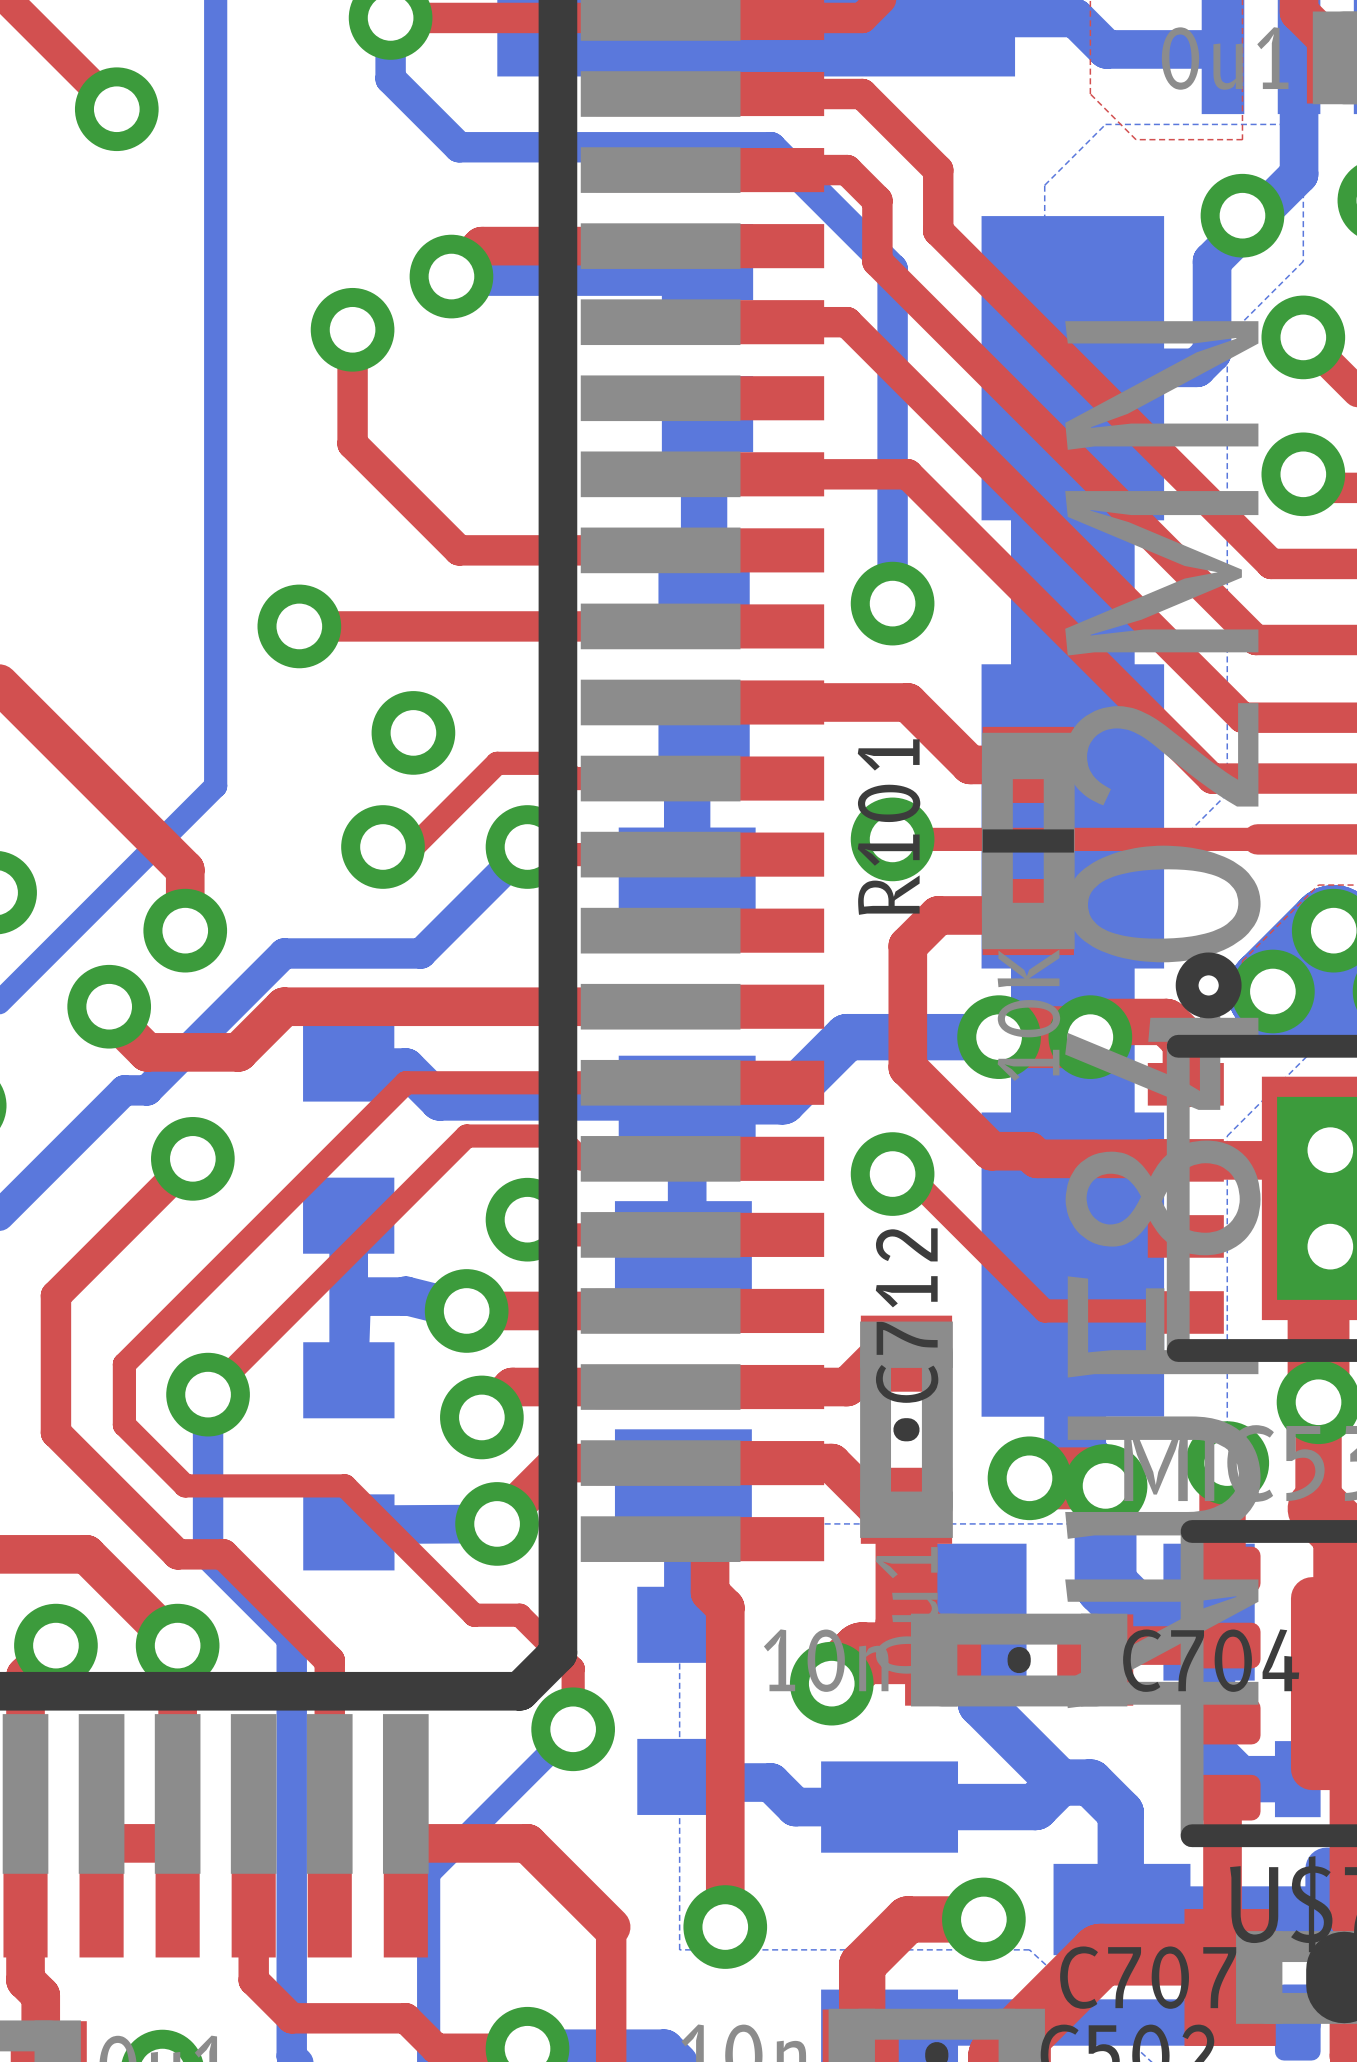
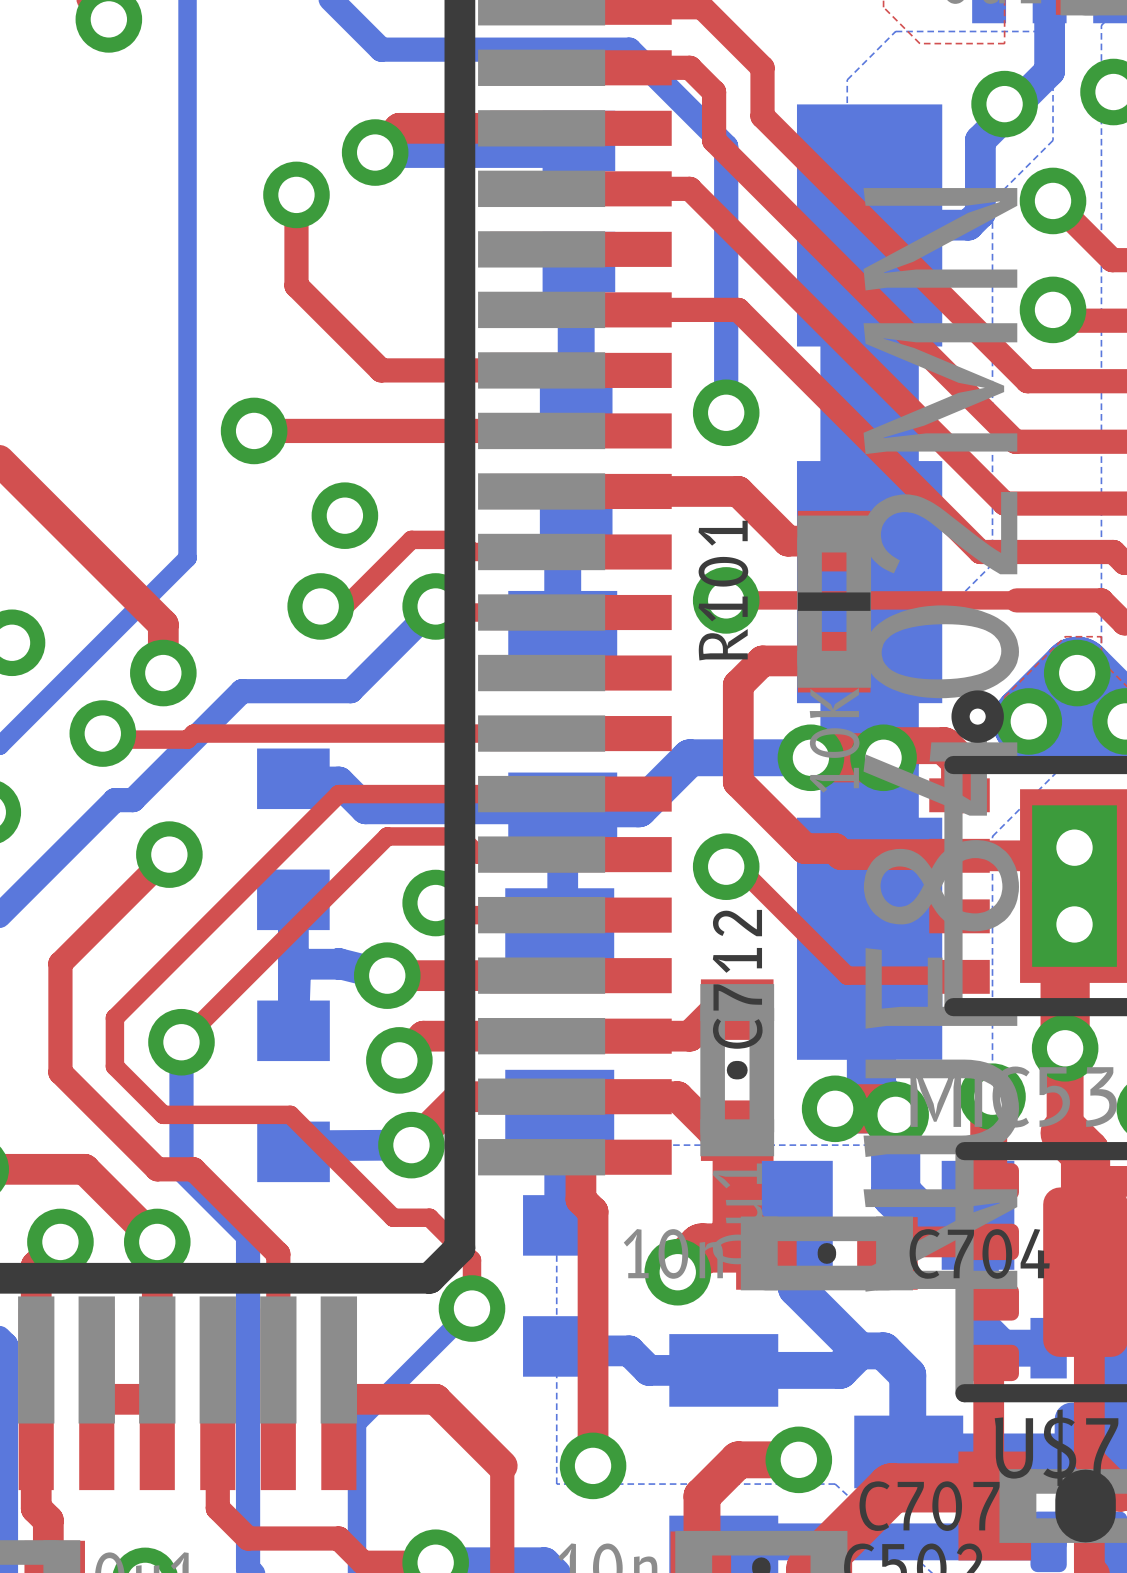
top track: (109, 1006) (109, 1014) (147, 1052) (238, 1052) (284, 1006) -> (102, 733) (108, 739) (187, 739) (193, 733) (242, 733)
top track width: thick (284, 1006) (710, 1006) -> thin (242, 733) (580, 733)

